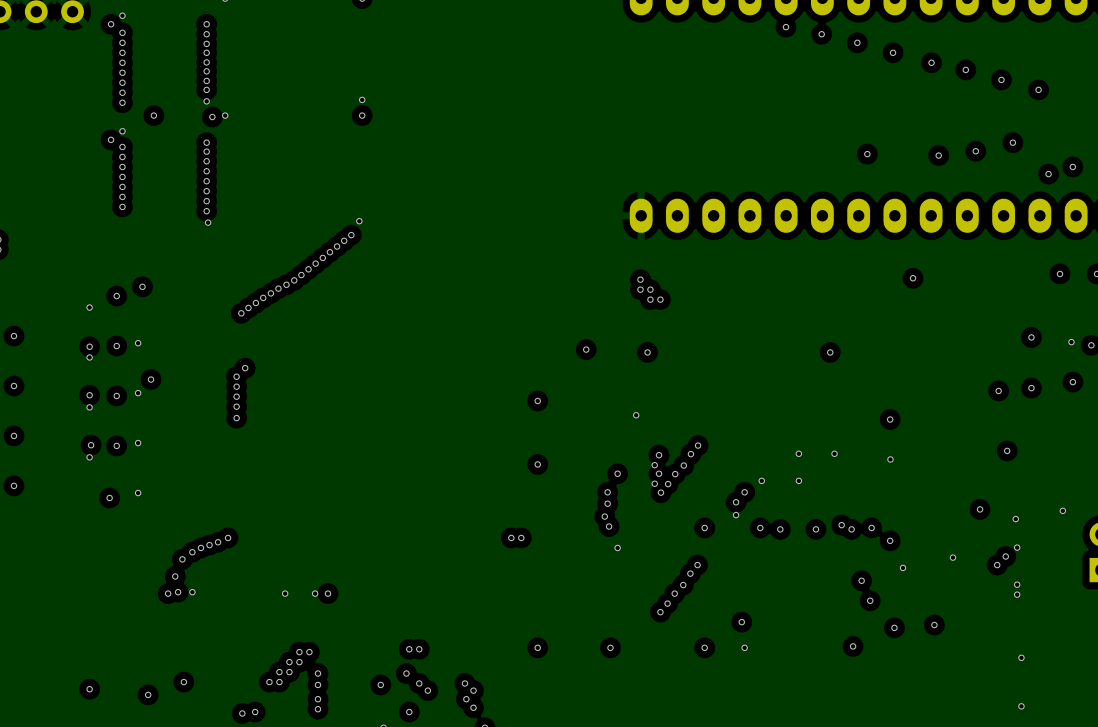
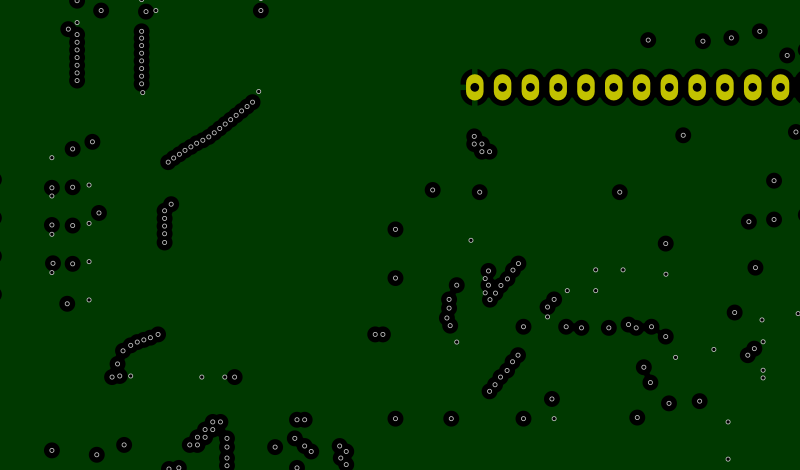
via: none -> (728, 421)
via: (1021, 657) -> none
via: none -> (728, 459)
via: (1021, 706) -> none

